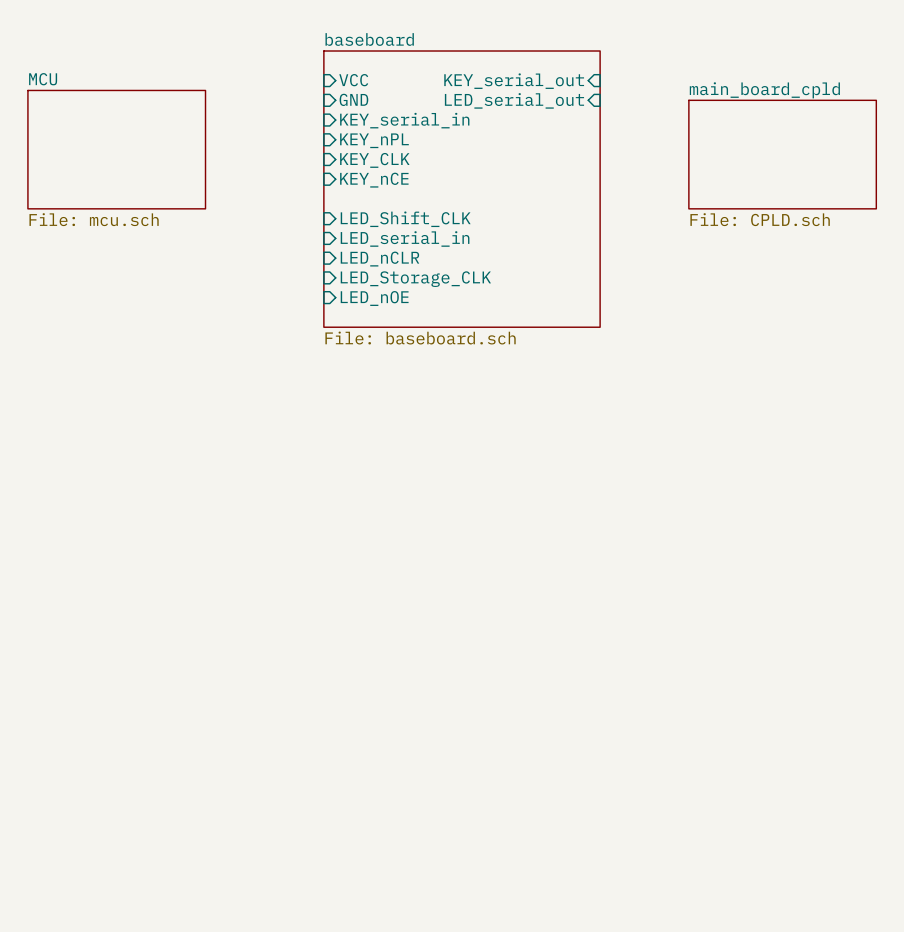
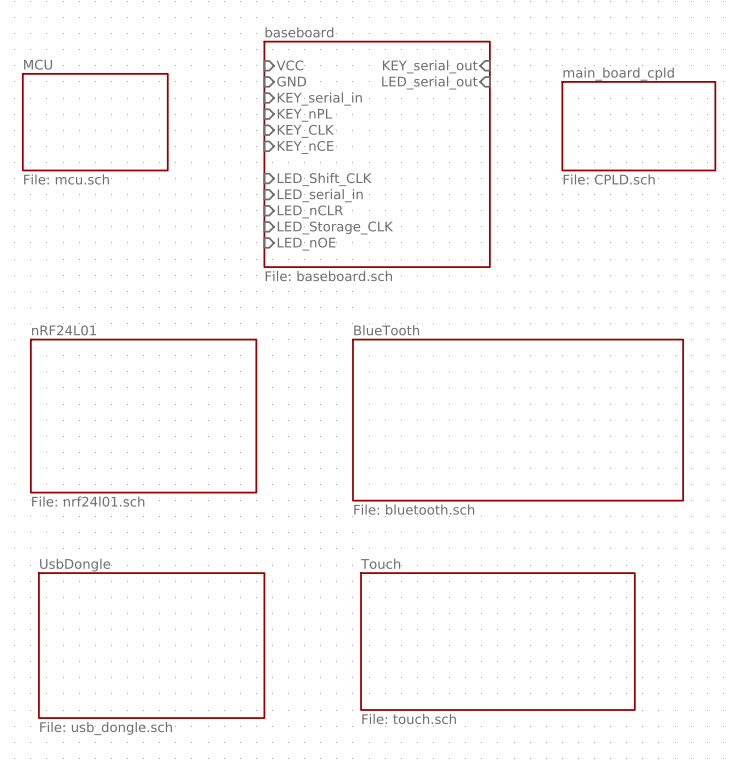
sheet nRF24L01: none -> File: nrf24l01.sch (143, 416)
sheet BlueTooth: none -> File: bluetooth.sch (518, 420)
sheet Touch: none -> File: touch.sch (497, 641)
sheet UsbDongle: none -> File: usb_dongle.sch (151, 645)

